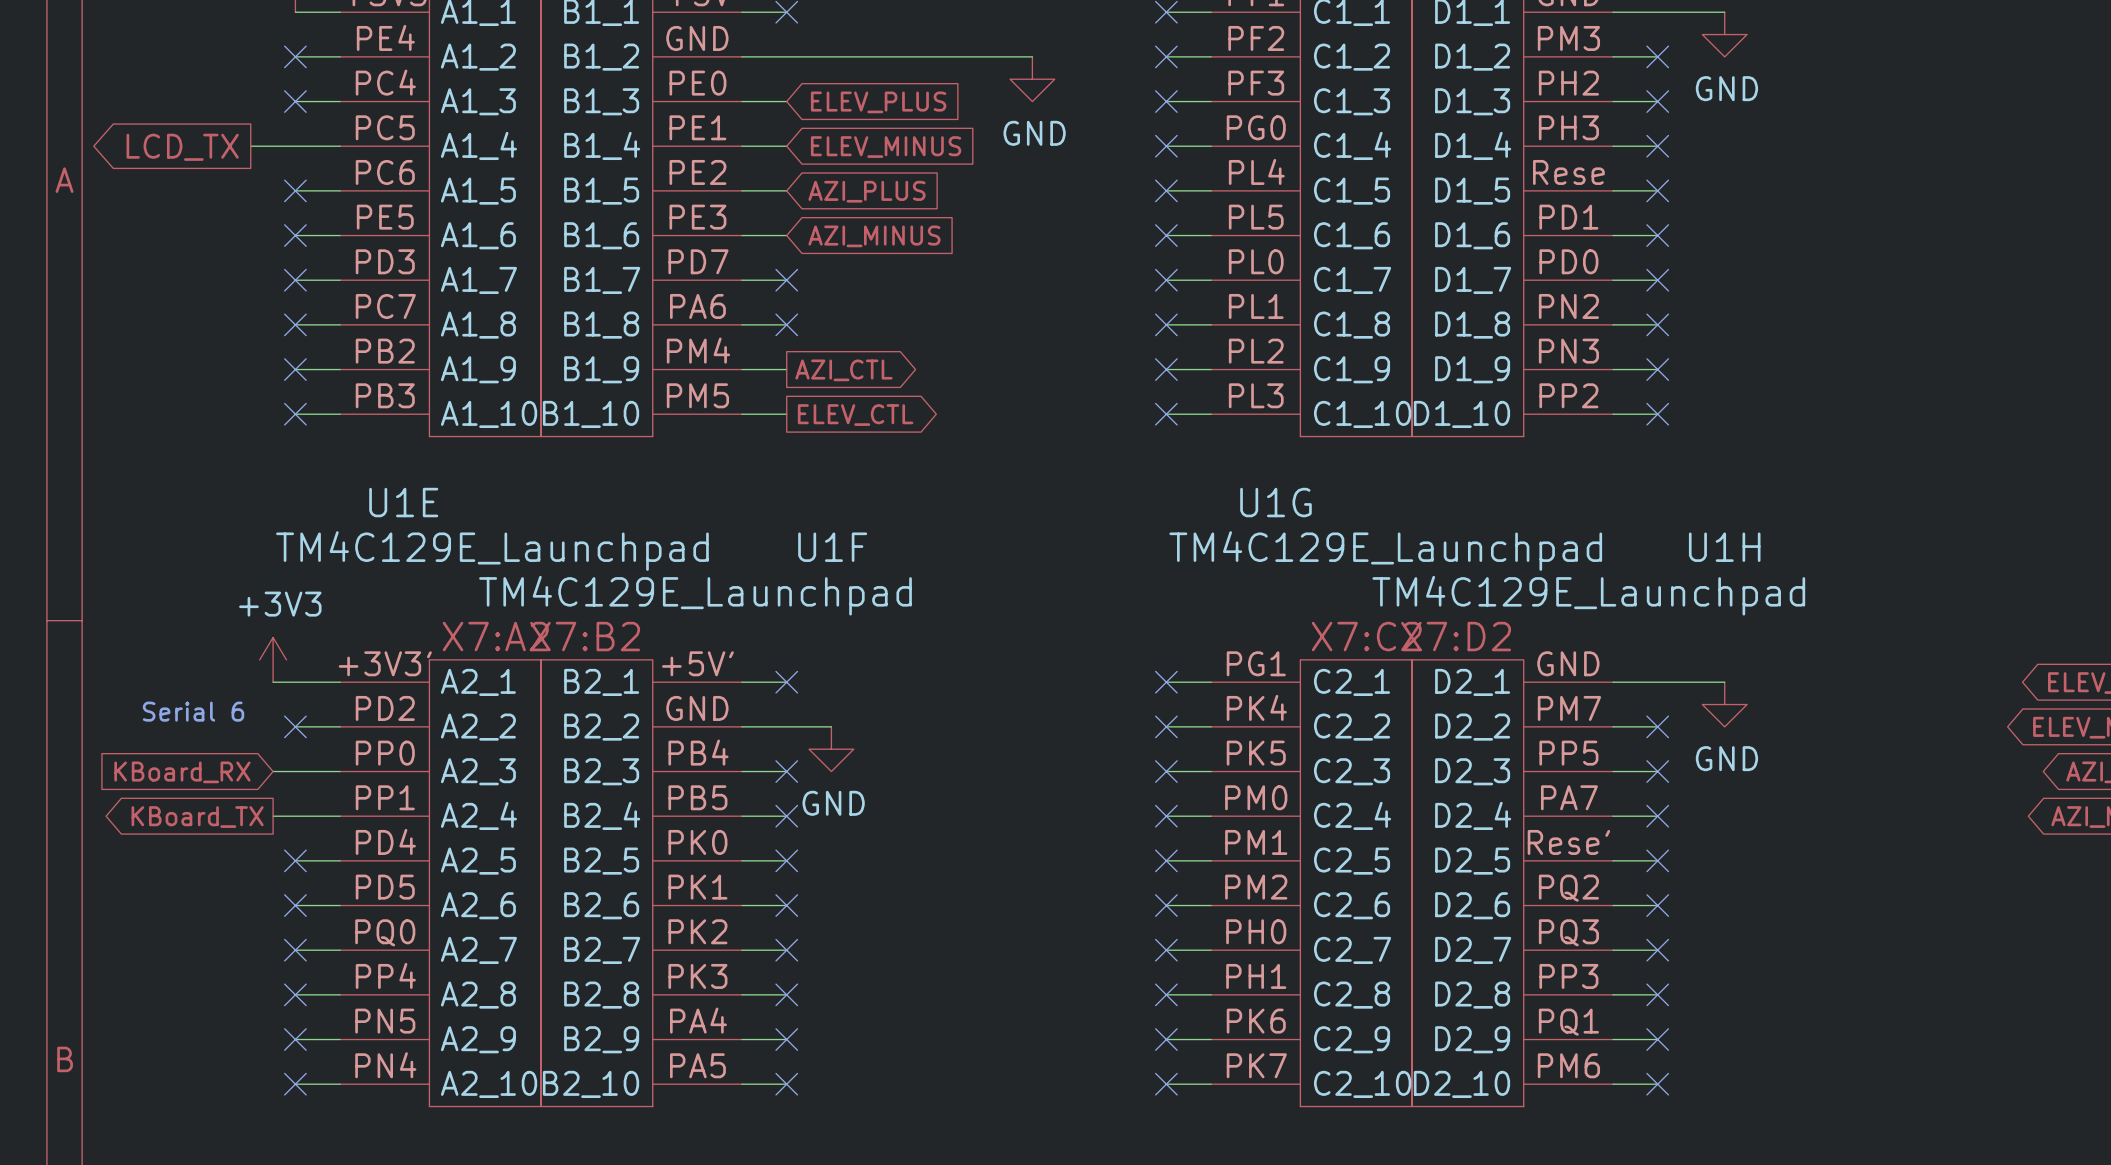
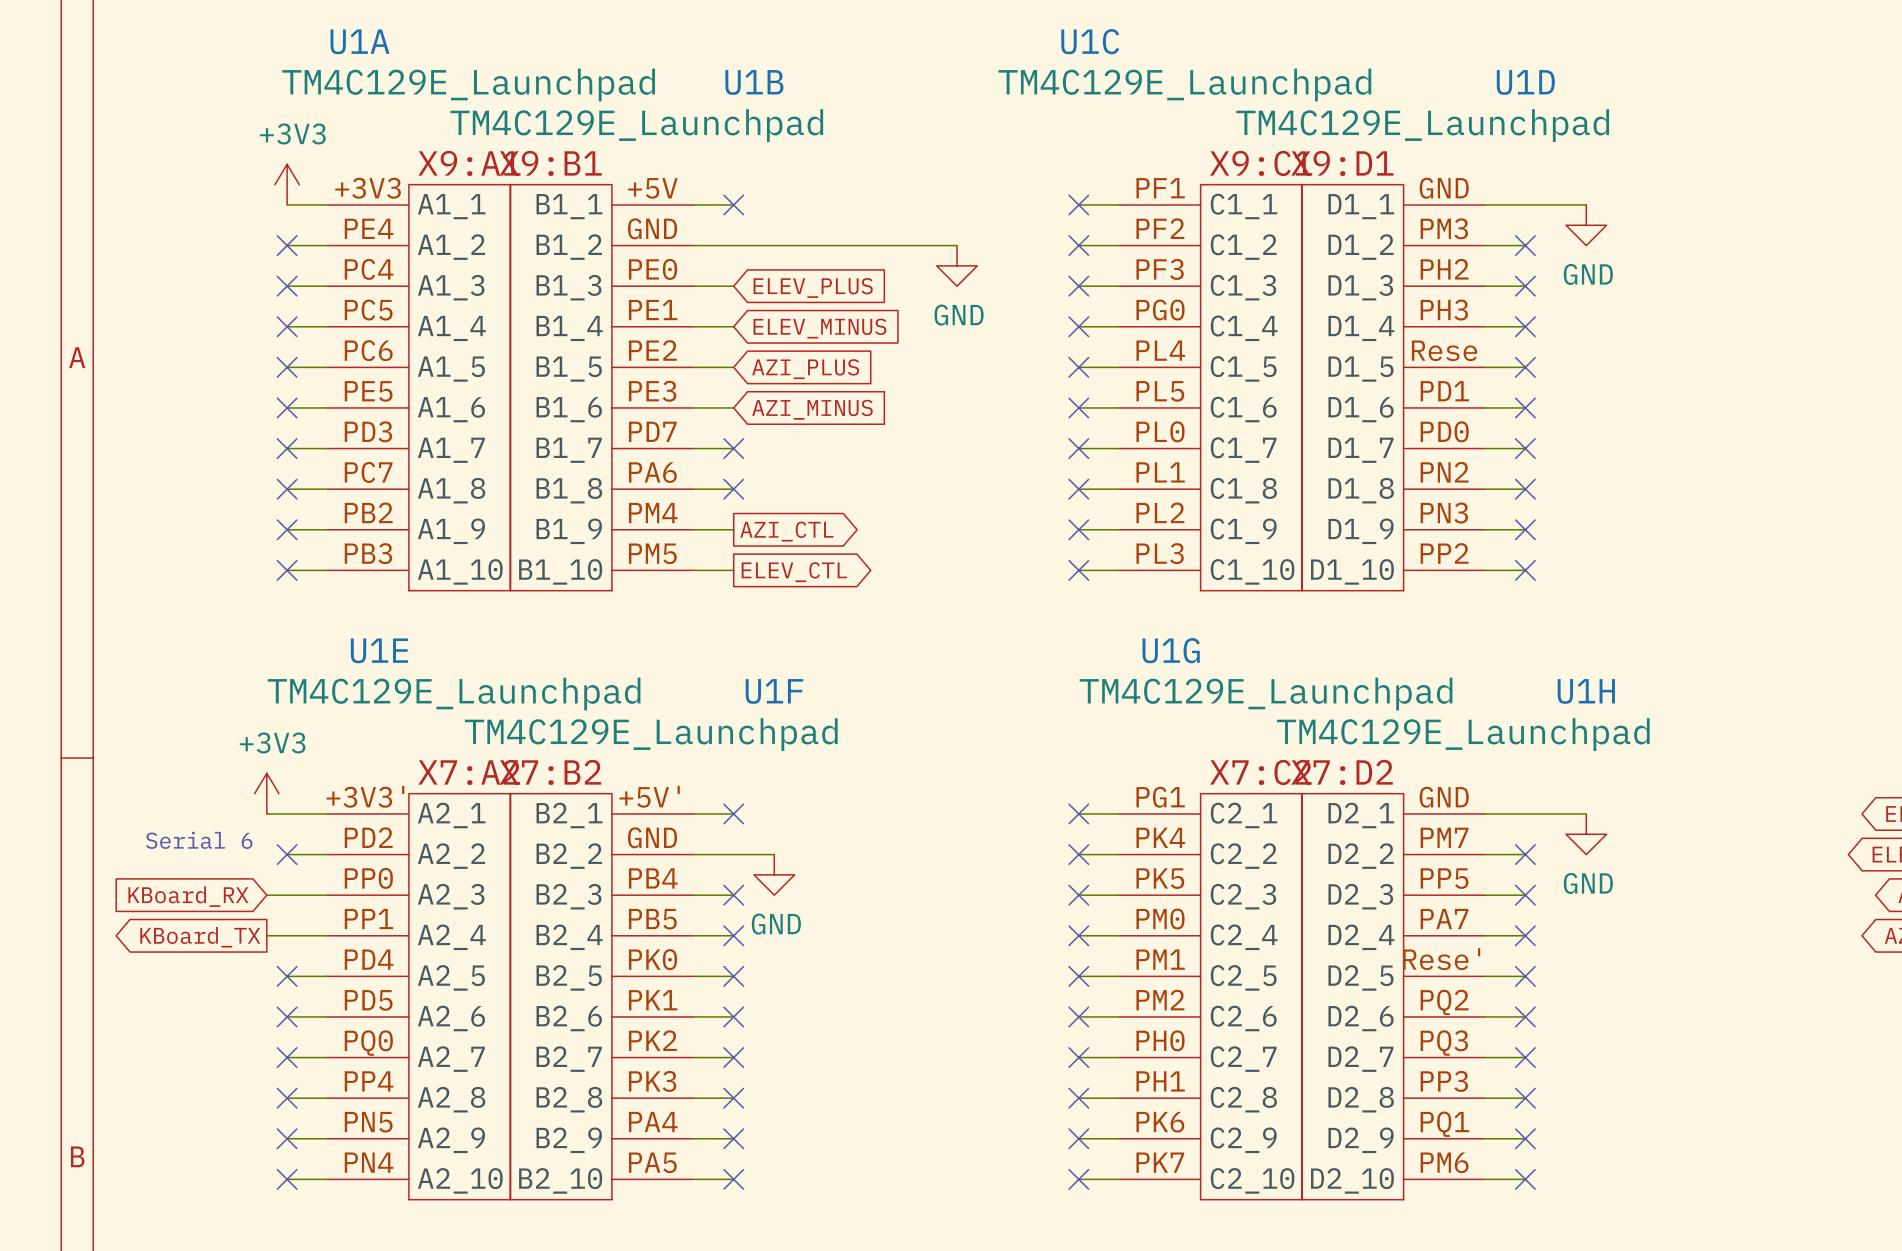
wire: (250, 146) (295, 146) -> none
no-connect mark: none -> (287, 326)
global label: LCD_TX (182, 147) -> none

